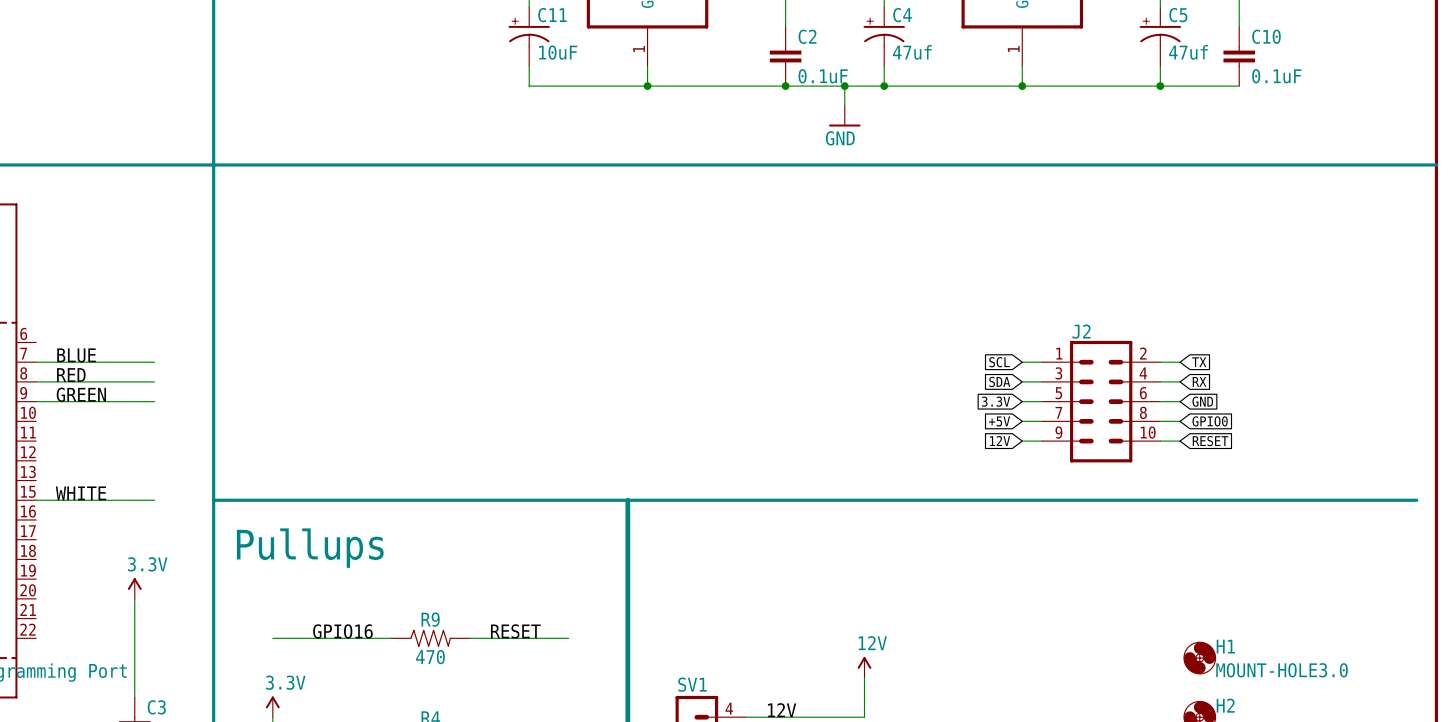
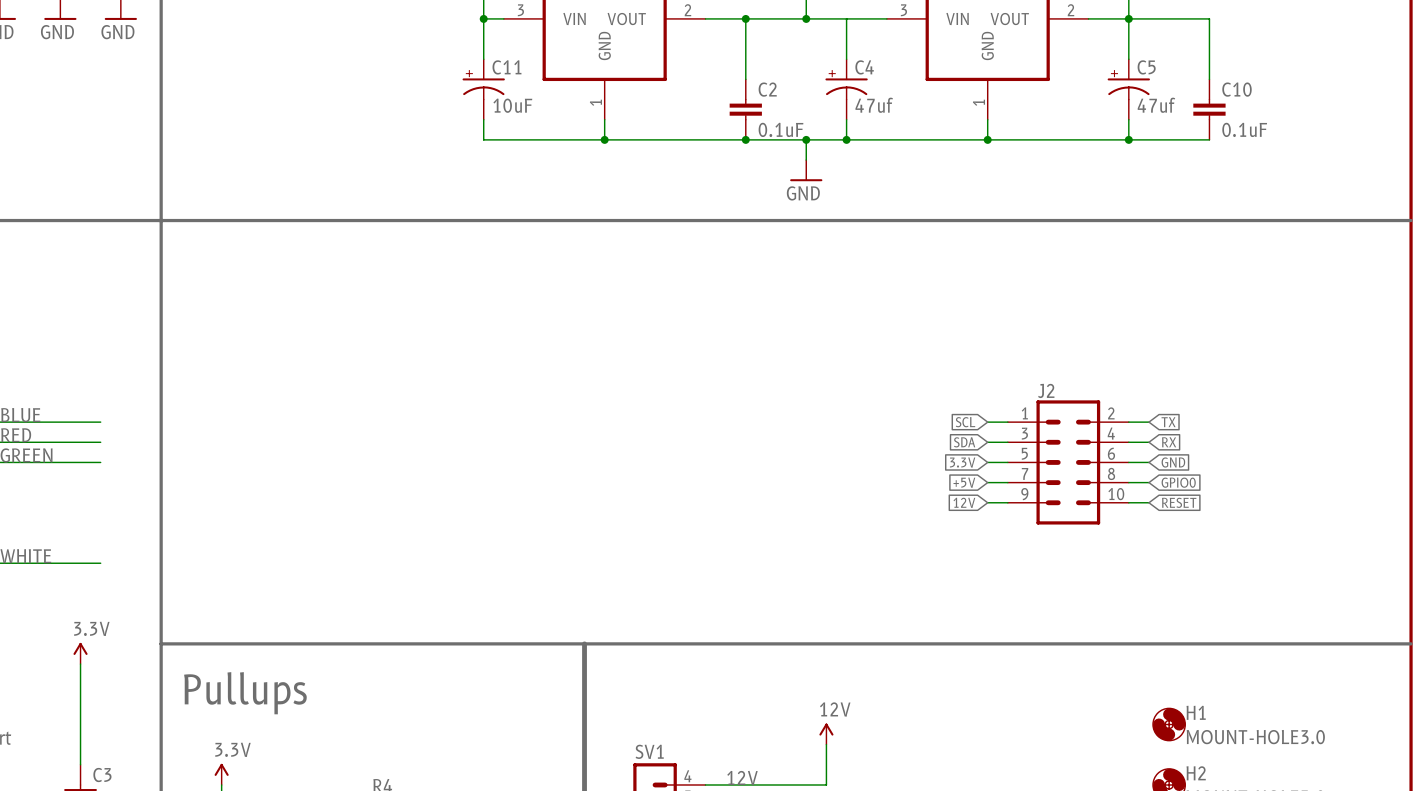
line: (213, 500) (1416, 500) -> none
line: (627, 500) (627, 579) -> none
text position: Pullups (310, 548) -> Pullups (245, 693)
line: none -> (161, 643) (1411, 643)
label: GPIO16 (342, 631) -> none
label: RESET (515, 631) -> none
wire: (272, 638) (391, 638) -> none
R9: 470 (430, 638) -> none
wire: (470, 638) (568, 638) -> none

